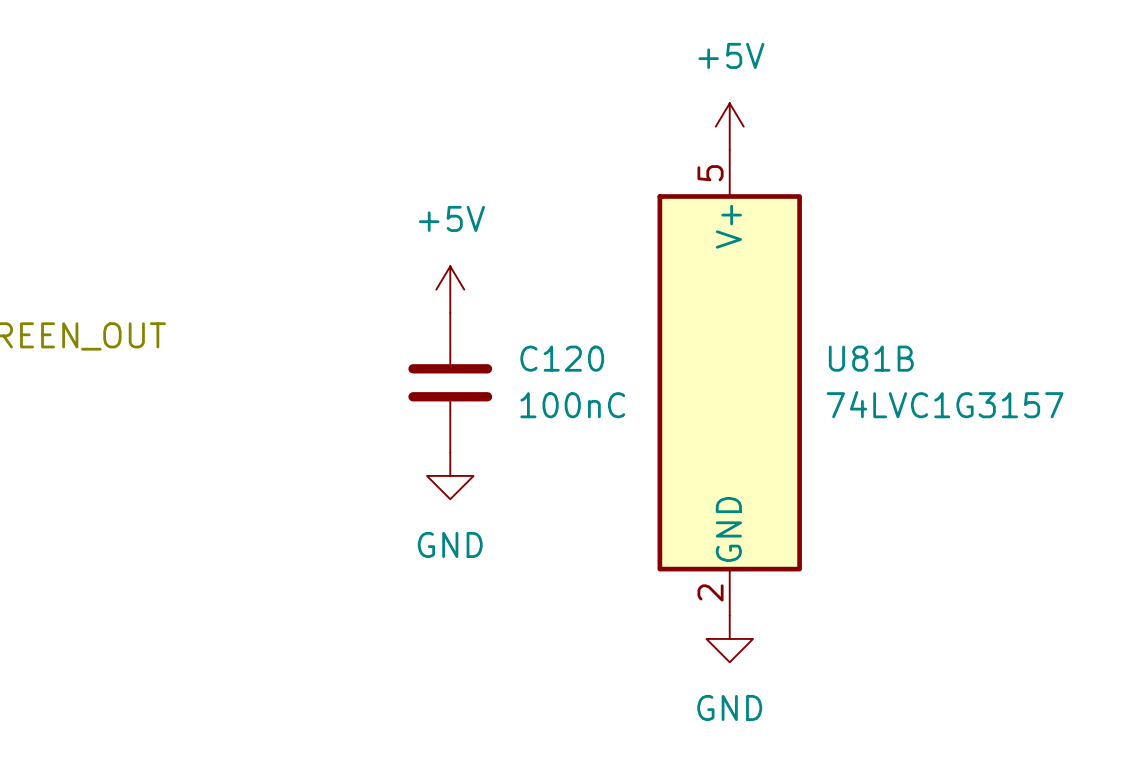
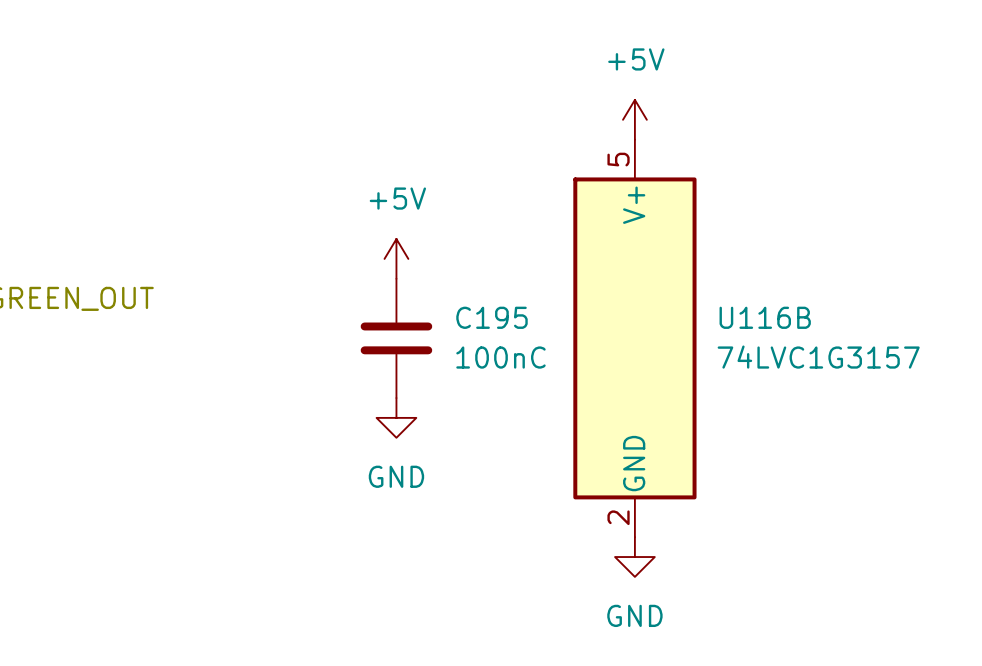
C120 name: C120 (562, 358) -> C195 (491, 317)
U81B name: U81B (871, 358) -> U116B (765, 317)

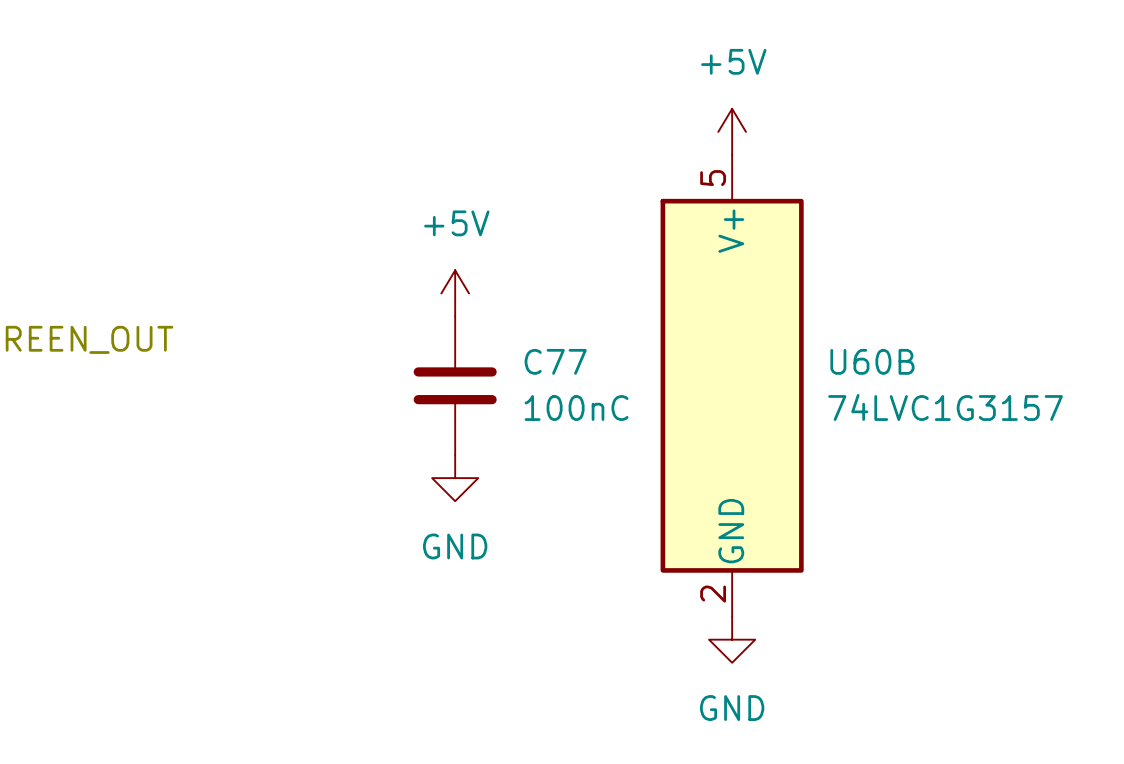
C195 name: C195 (491, 317) -> C77 (555, 361)
U116B name: U116B (765, 317) -> U60B (872, 361)

